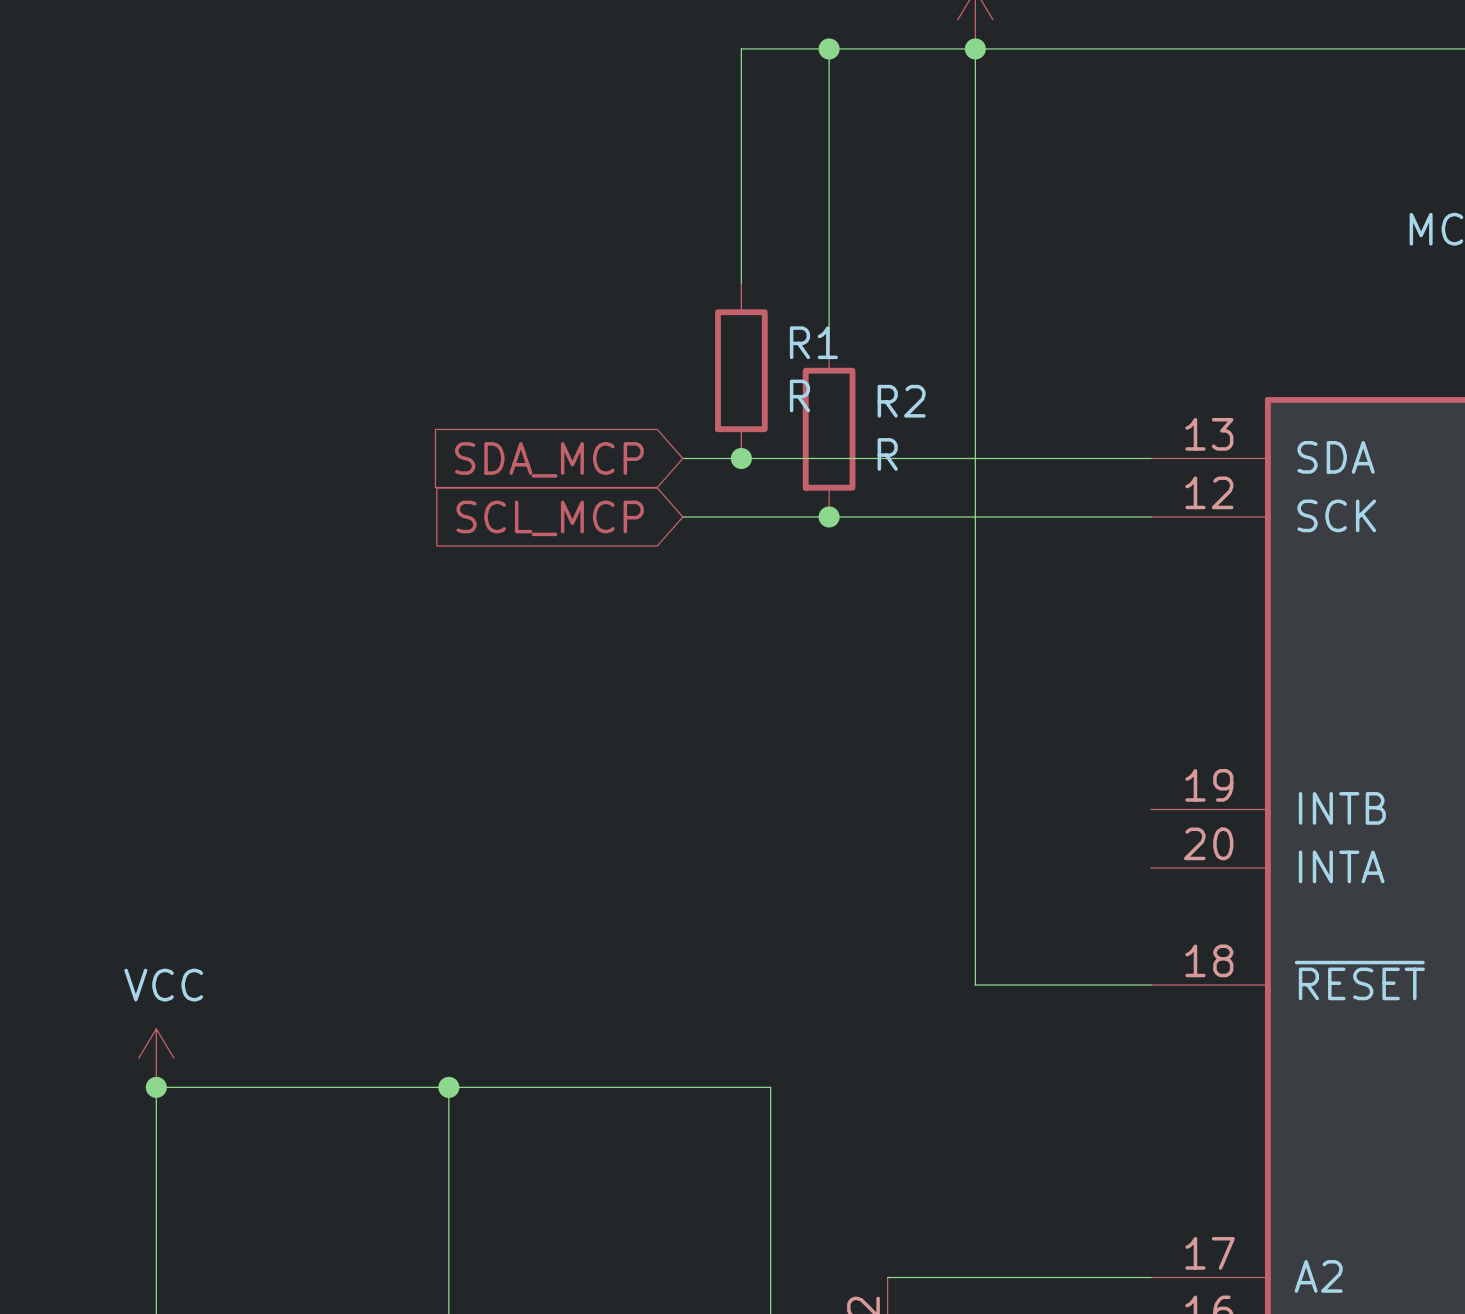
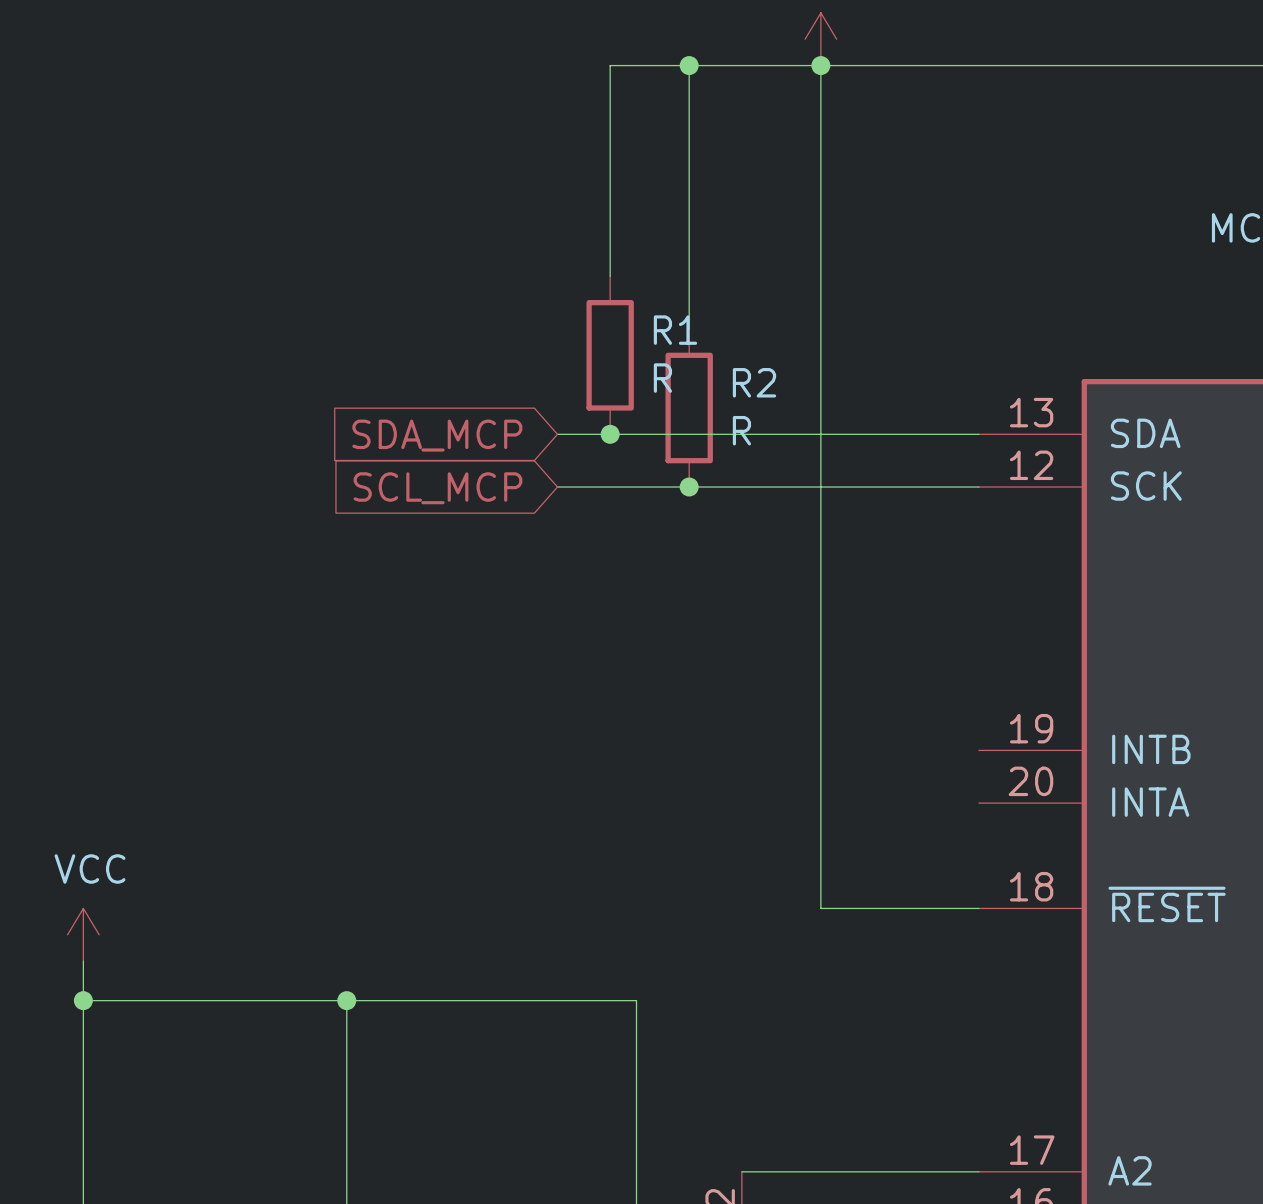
power symbol position: VCC (156, 1058) -> VCC (83, 934)

